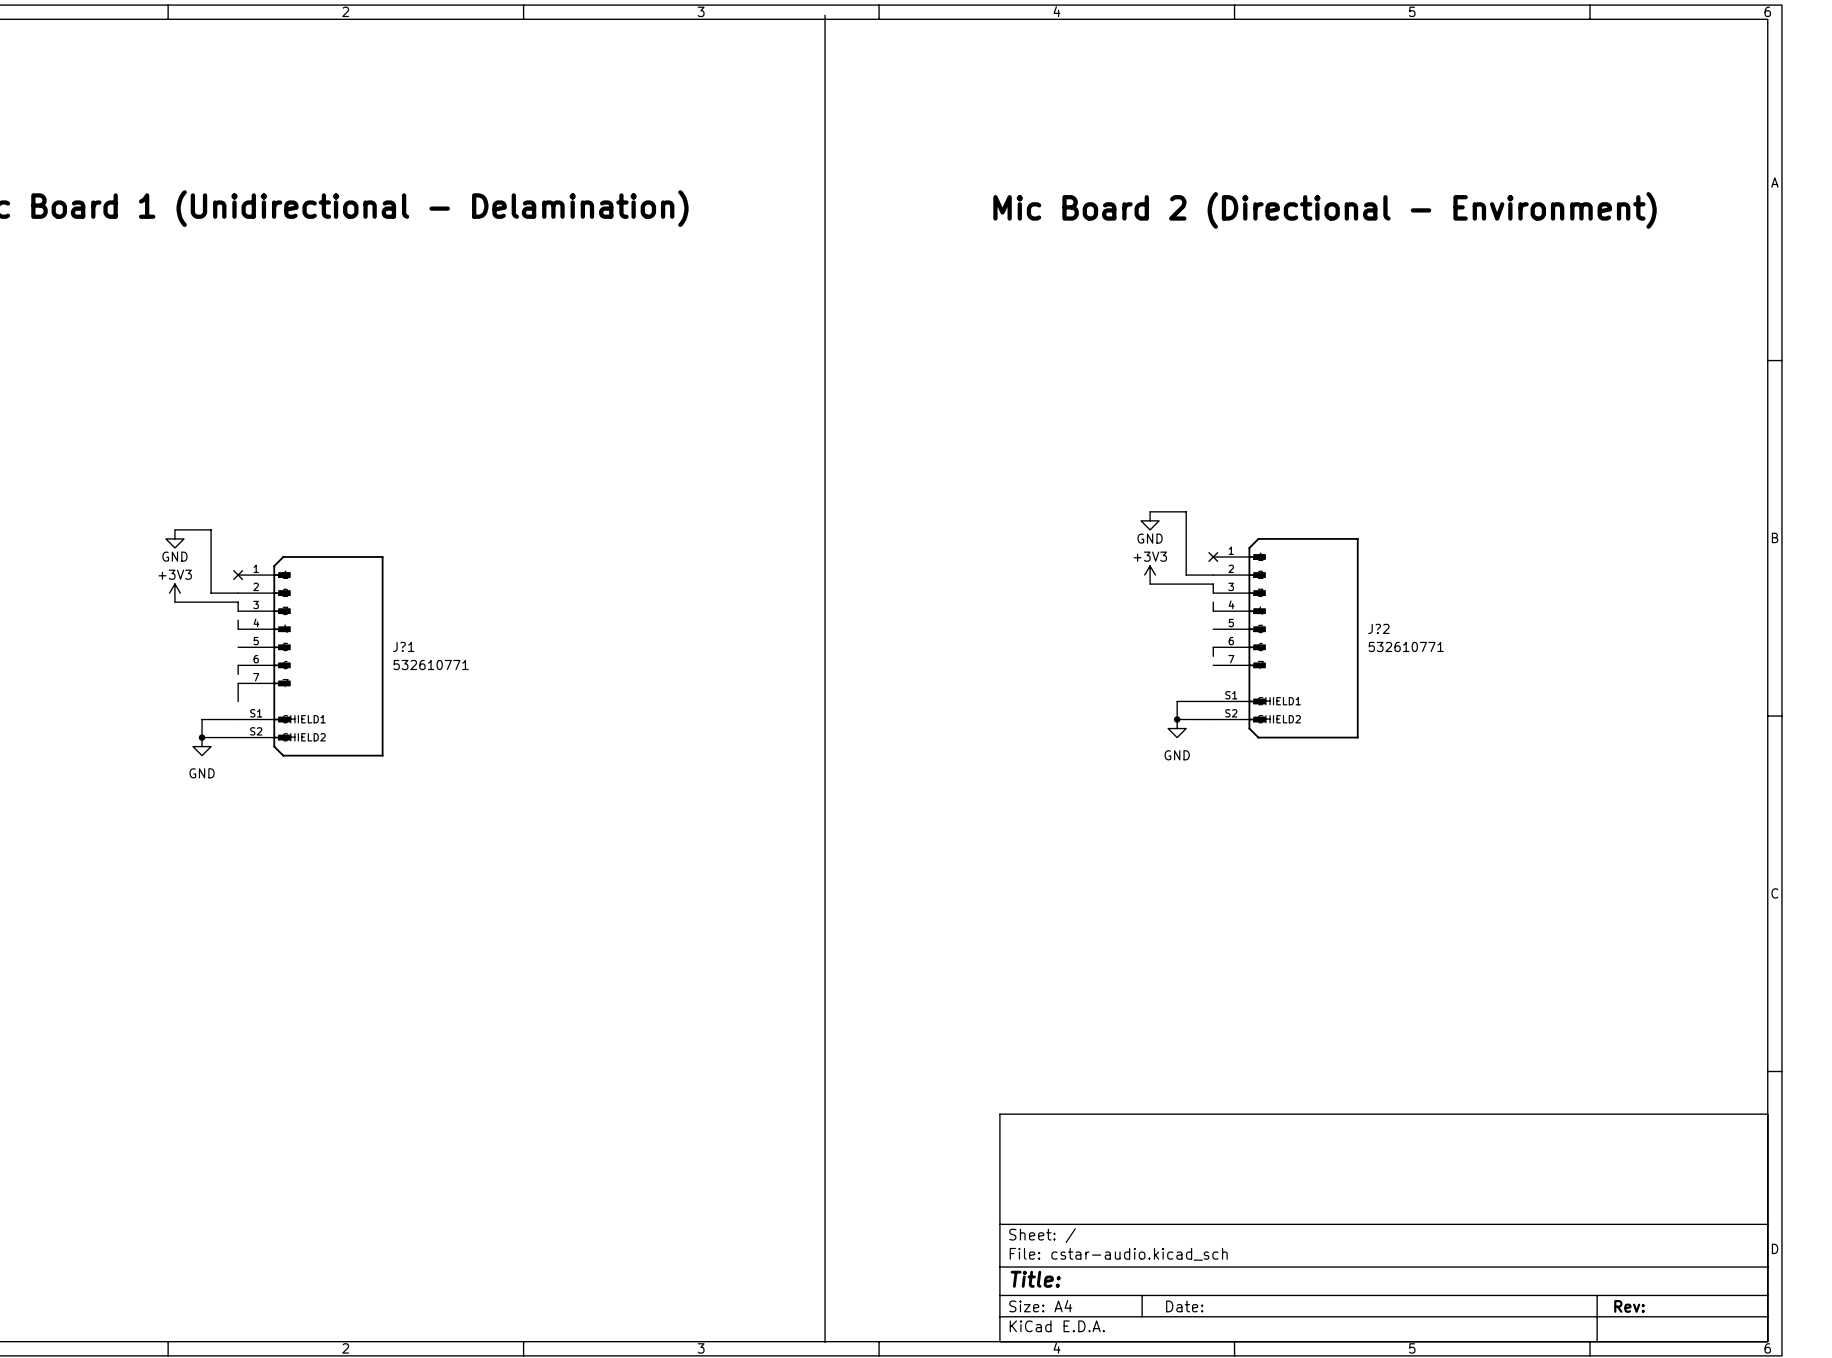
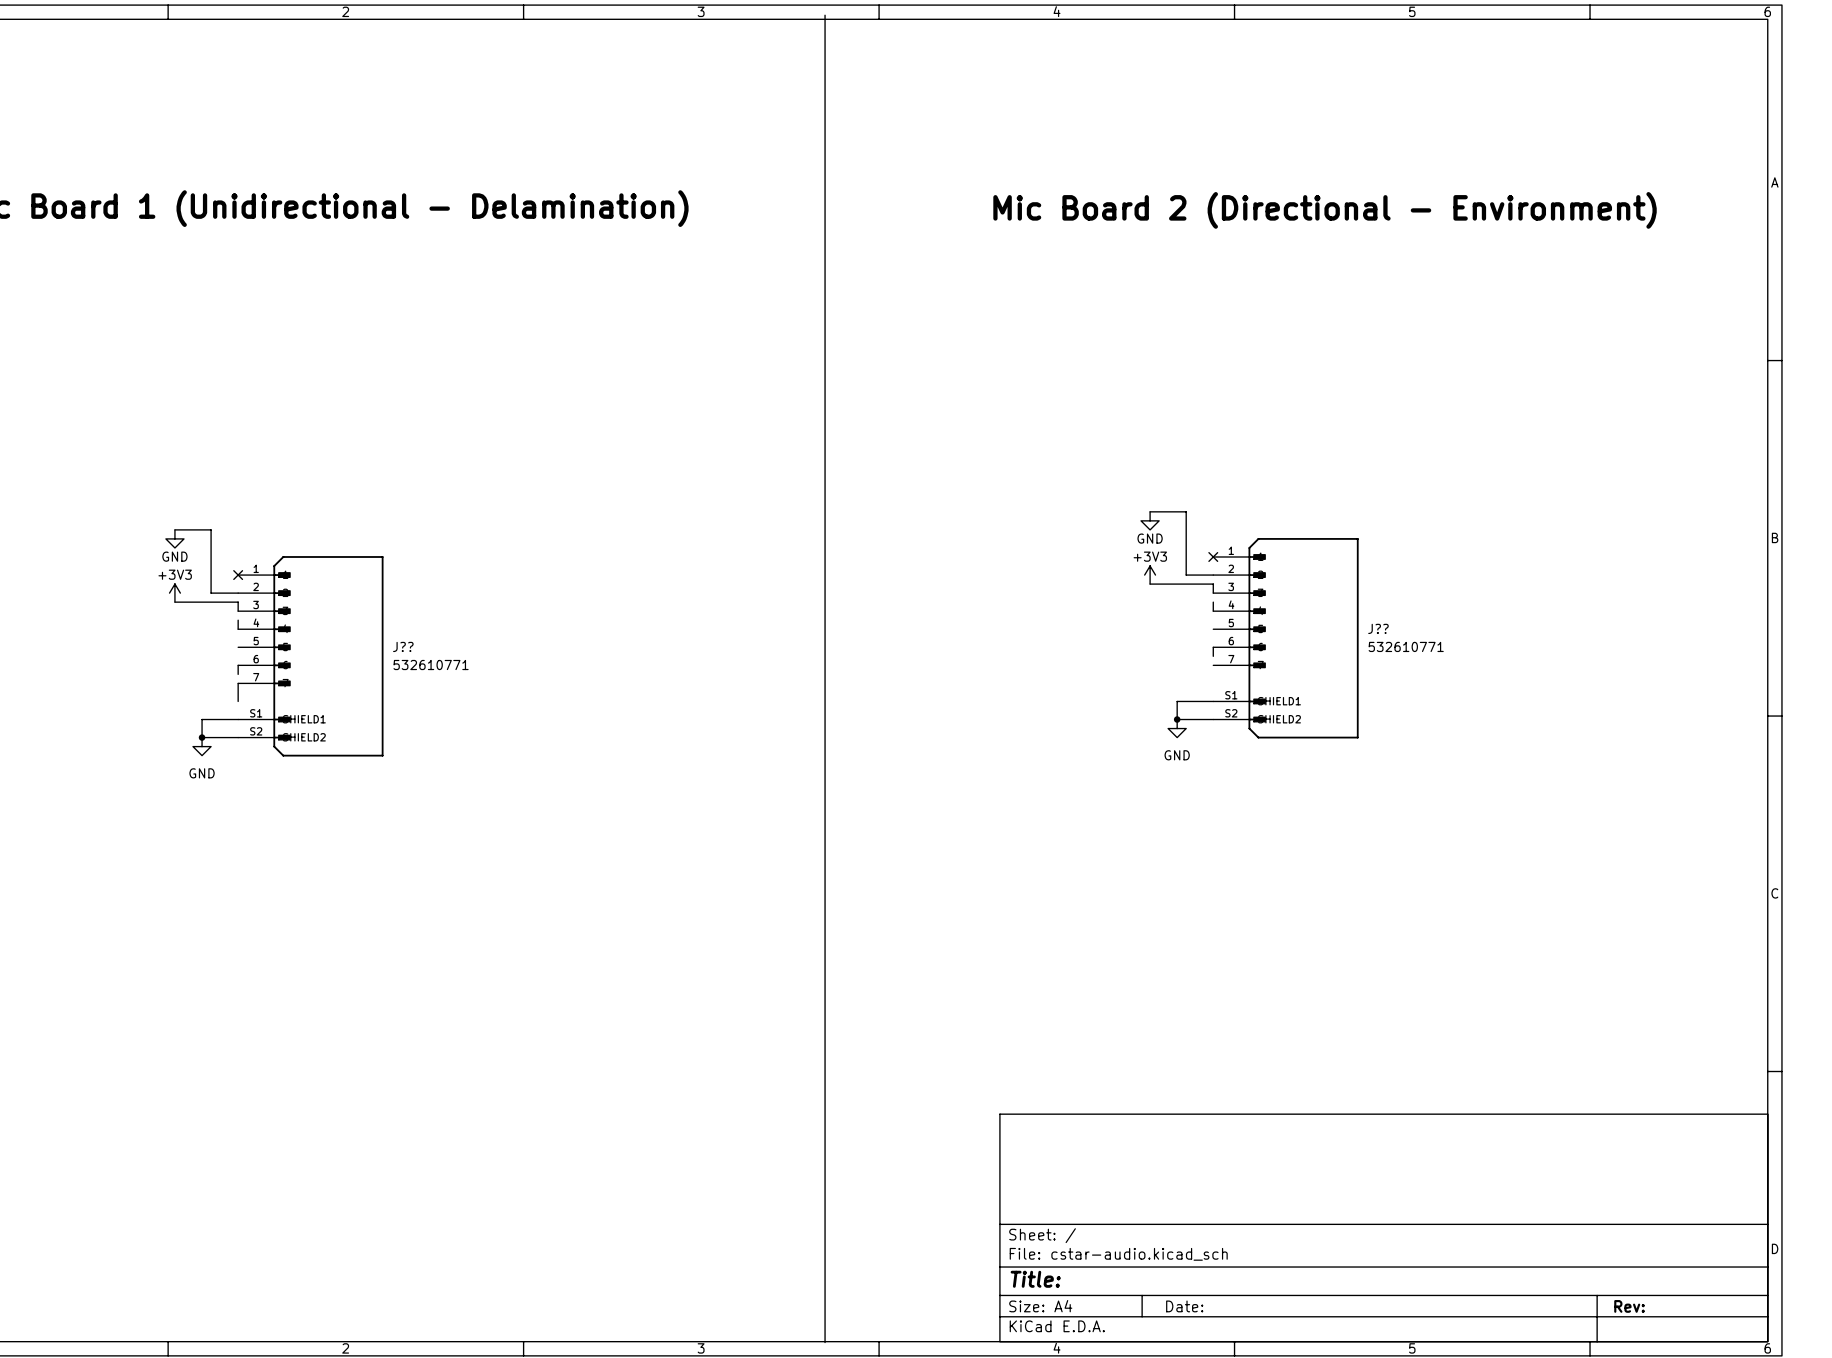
J?2 name: J?2 (1378, 628) -> J?? (1378, 628)
J?1 name: J?1 (403, 646) -> J?? (403, 646)

